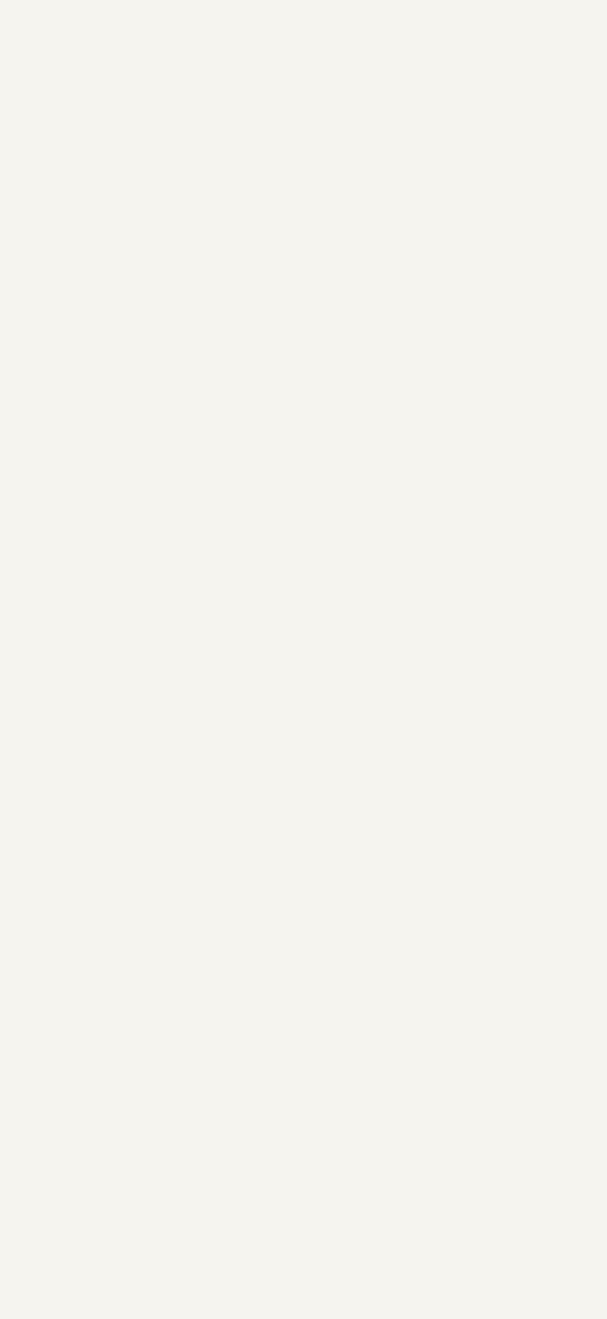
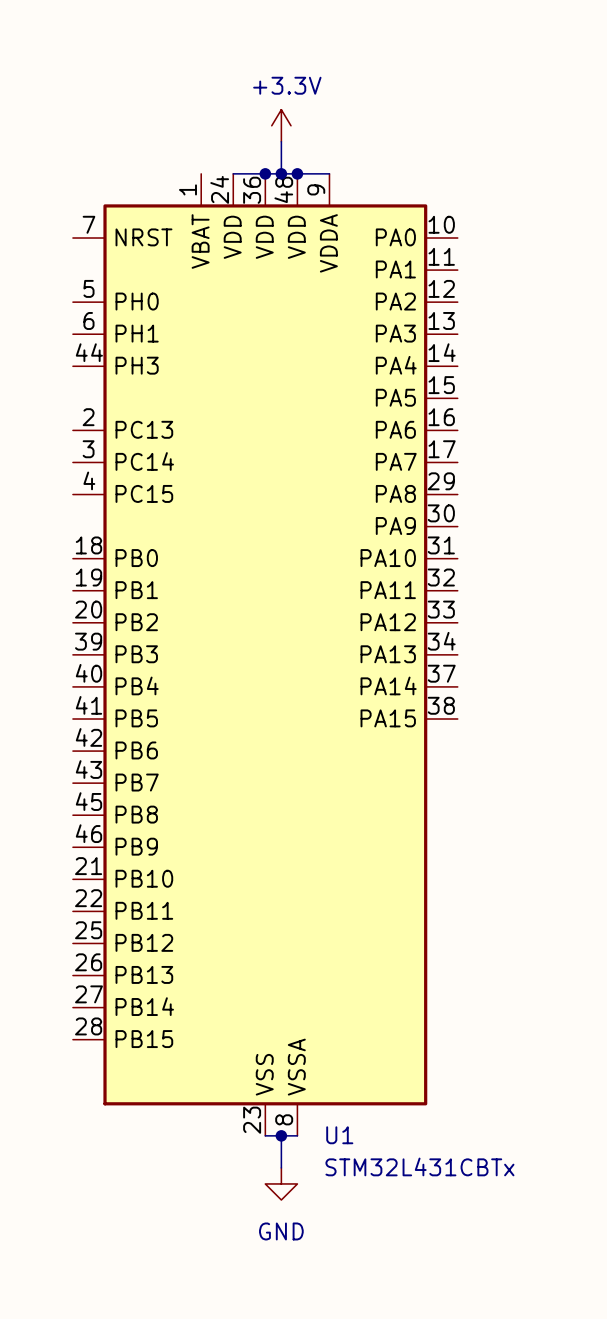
power symbol: none -> +3.3V (281, 125)
wire: none -> (281, 141) (281, 173)
wire: none -> (233, 173) (329, 173)
junction: none -> (265, 173)
junction: none -> (281, 173)
junction: none -> (297, 173)
U1: none -> STM32L431CBTx (265, 654)
wire: none -> (265, 1135) (297, 1135)
wire: none -> (281, 1135) (281, 1167)
junction: none -> (281, 1135)
power symbol: none -> GND (281, 1183)

